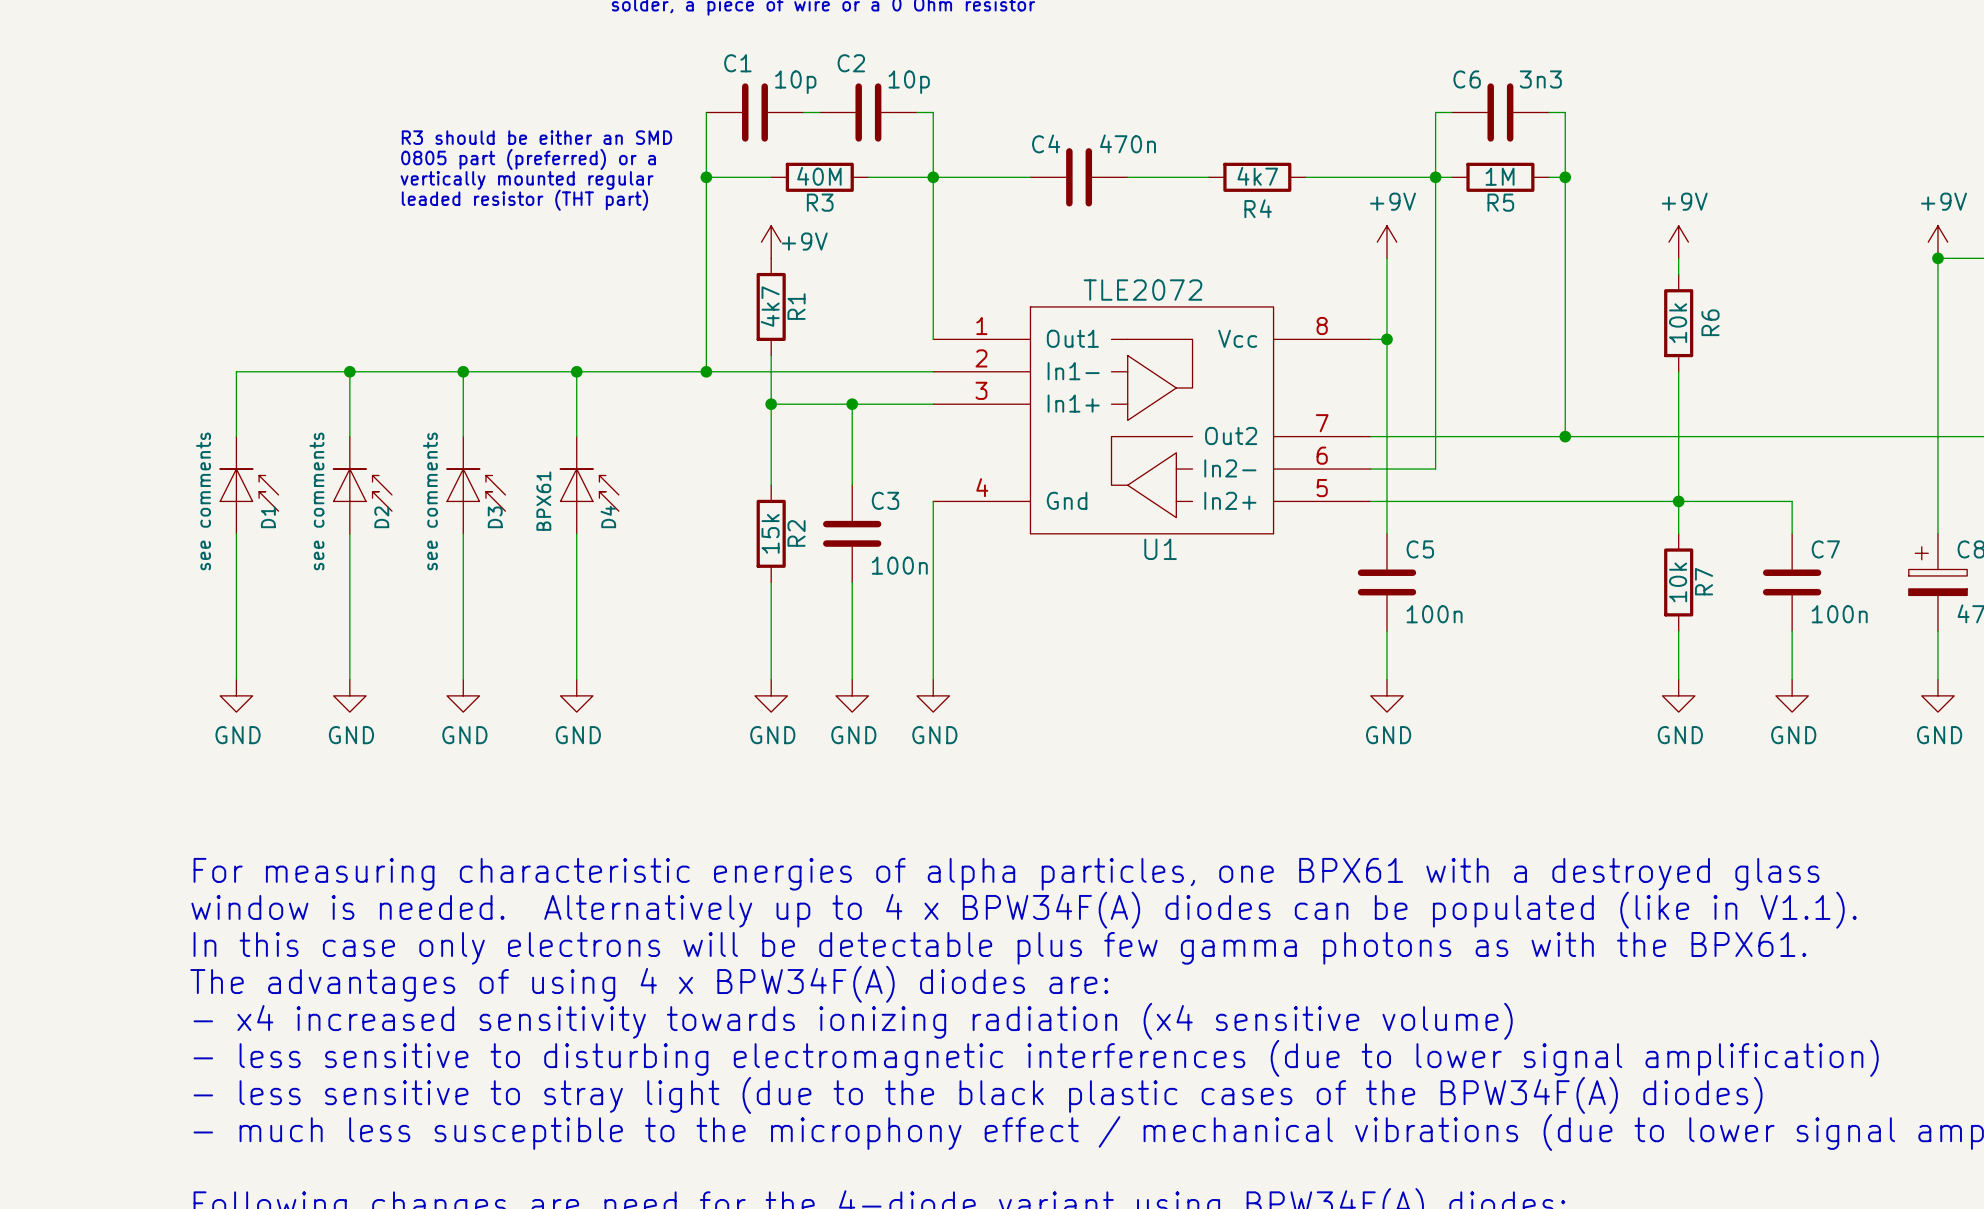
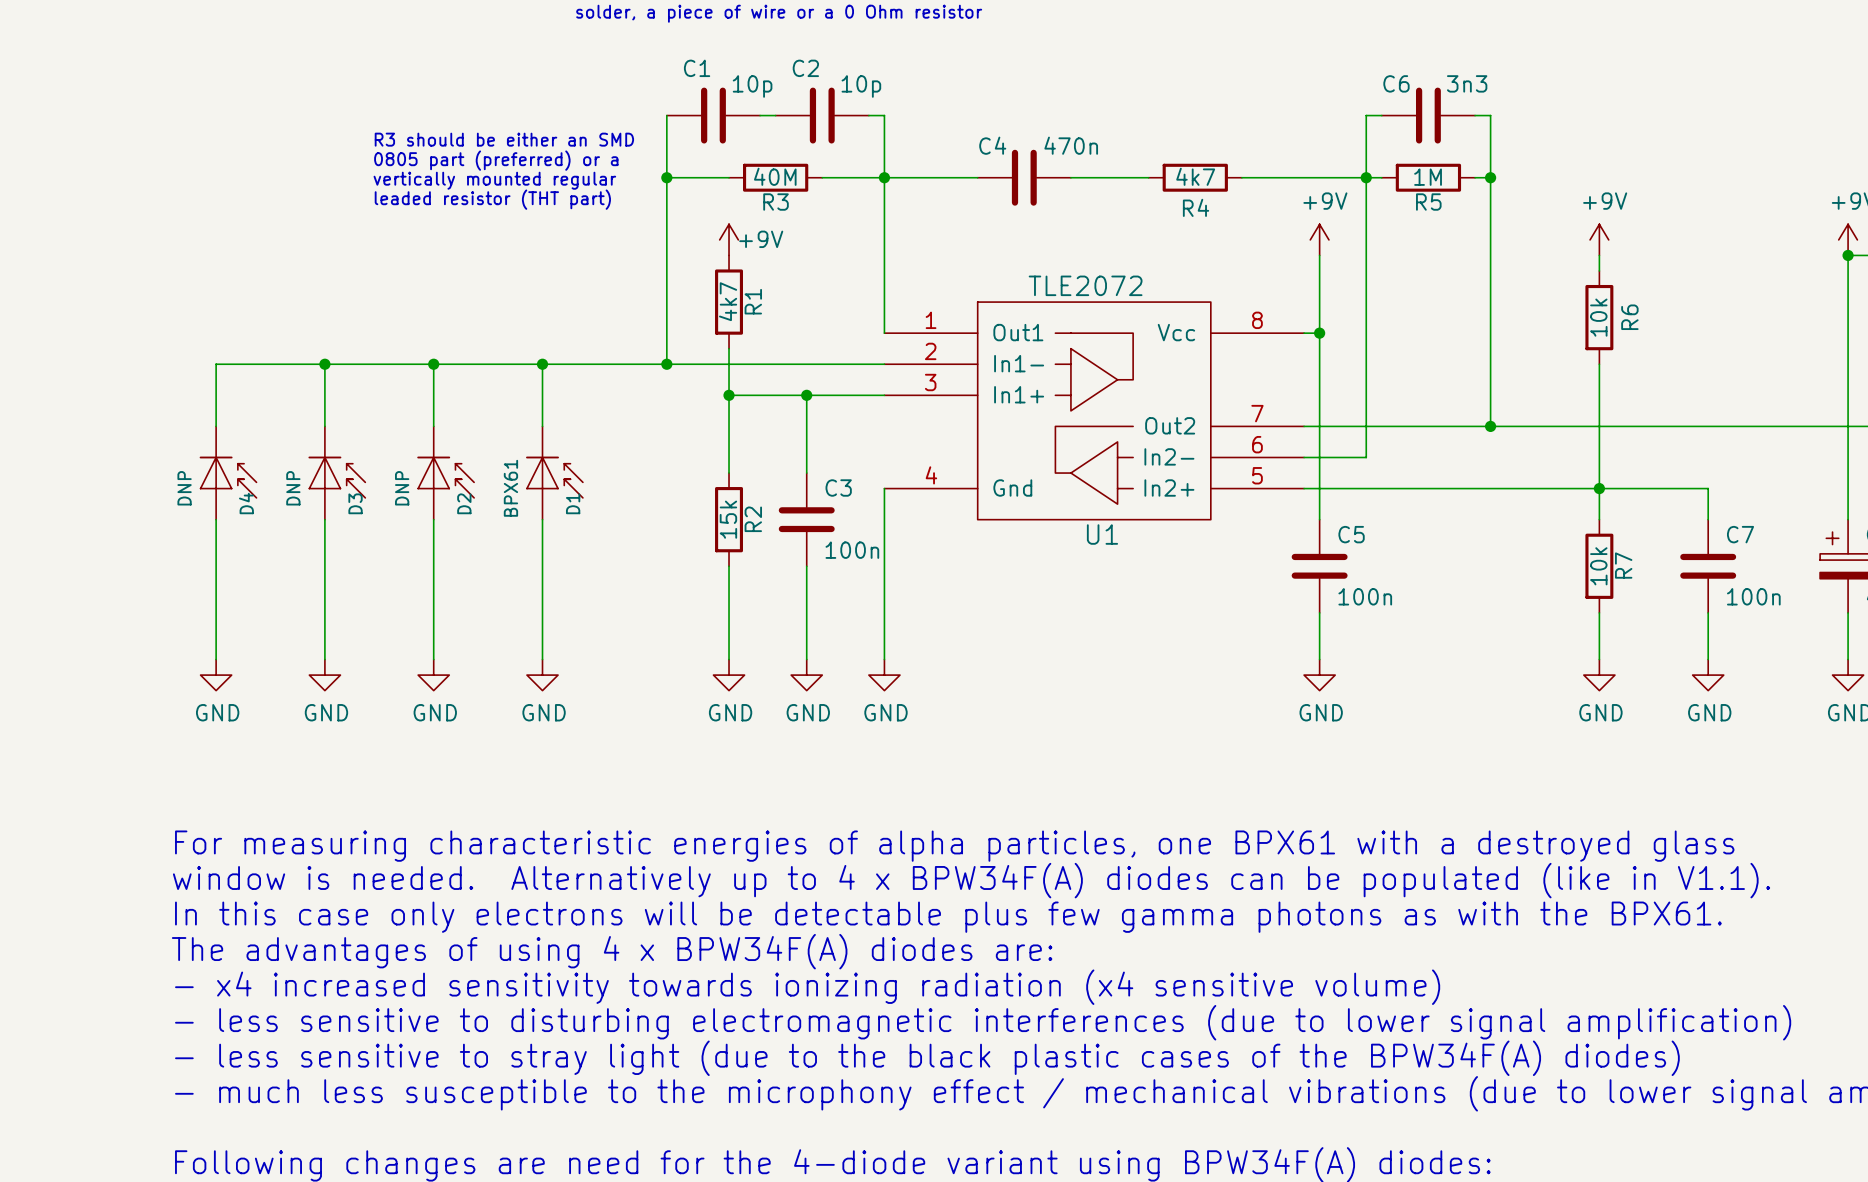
D1 value: see comments (203, 501) -> DNP (184, 488)
D2 value: see comments (316, 501) -> DNP (293, 488)
D3 value: see comments (430, 501) -> DNP (402, 488)
D1 name: D1 (268, 517) -> D4 (246, 503)
D2 name: D2 (381, 517) -> D3 (355, 503)
D3 name: D3 (495, 517) -> D2 (464, 503)
D4 name: D4 (608, 517) -> D1 (573, 503)

